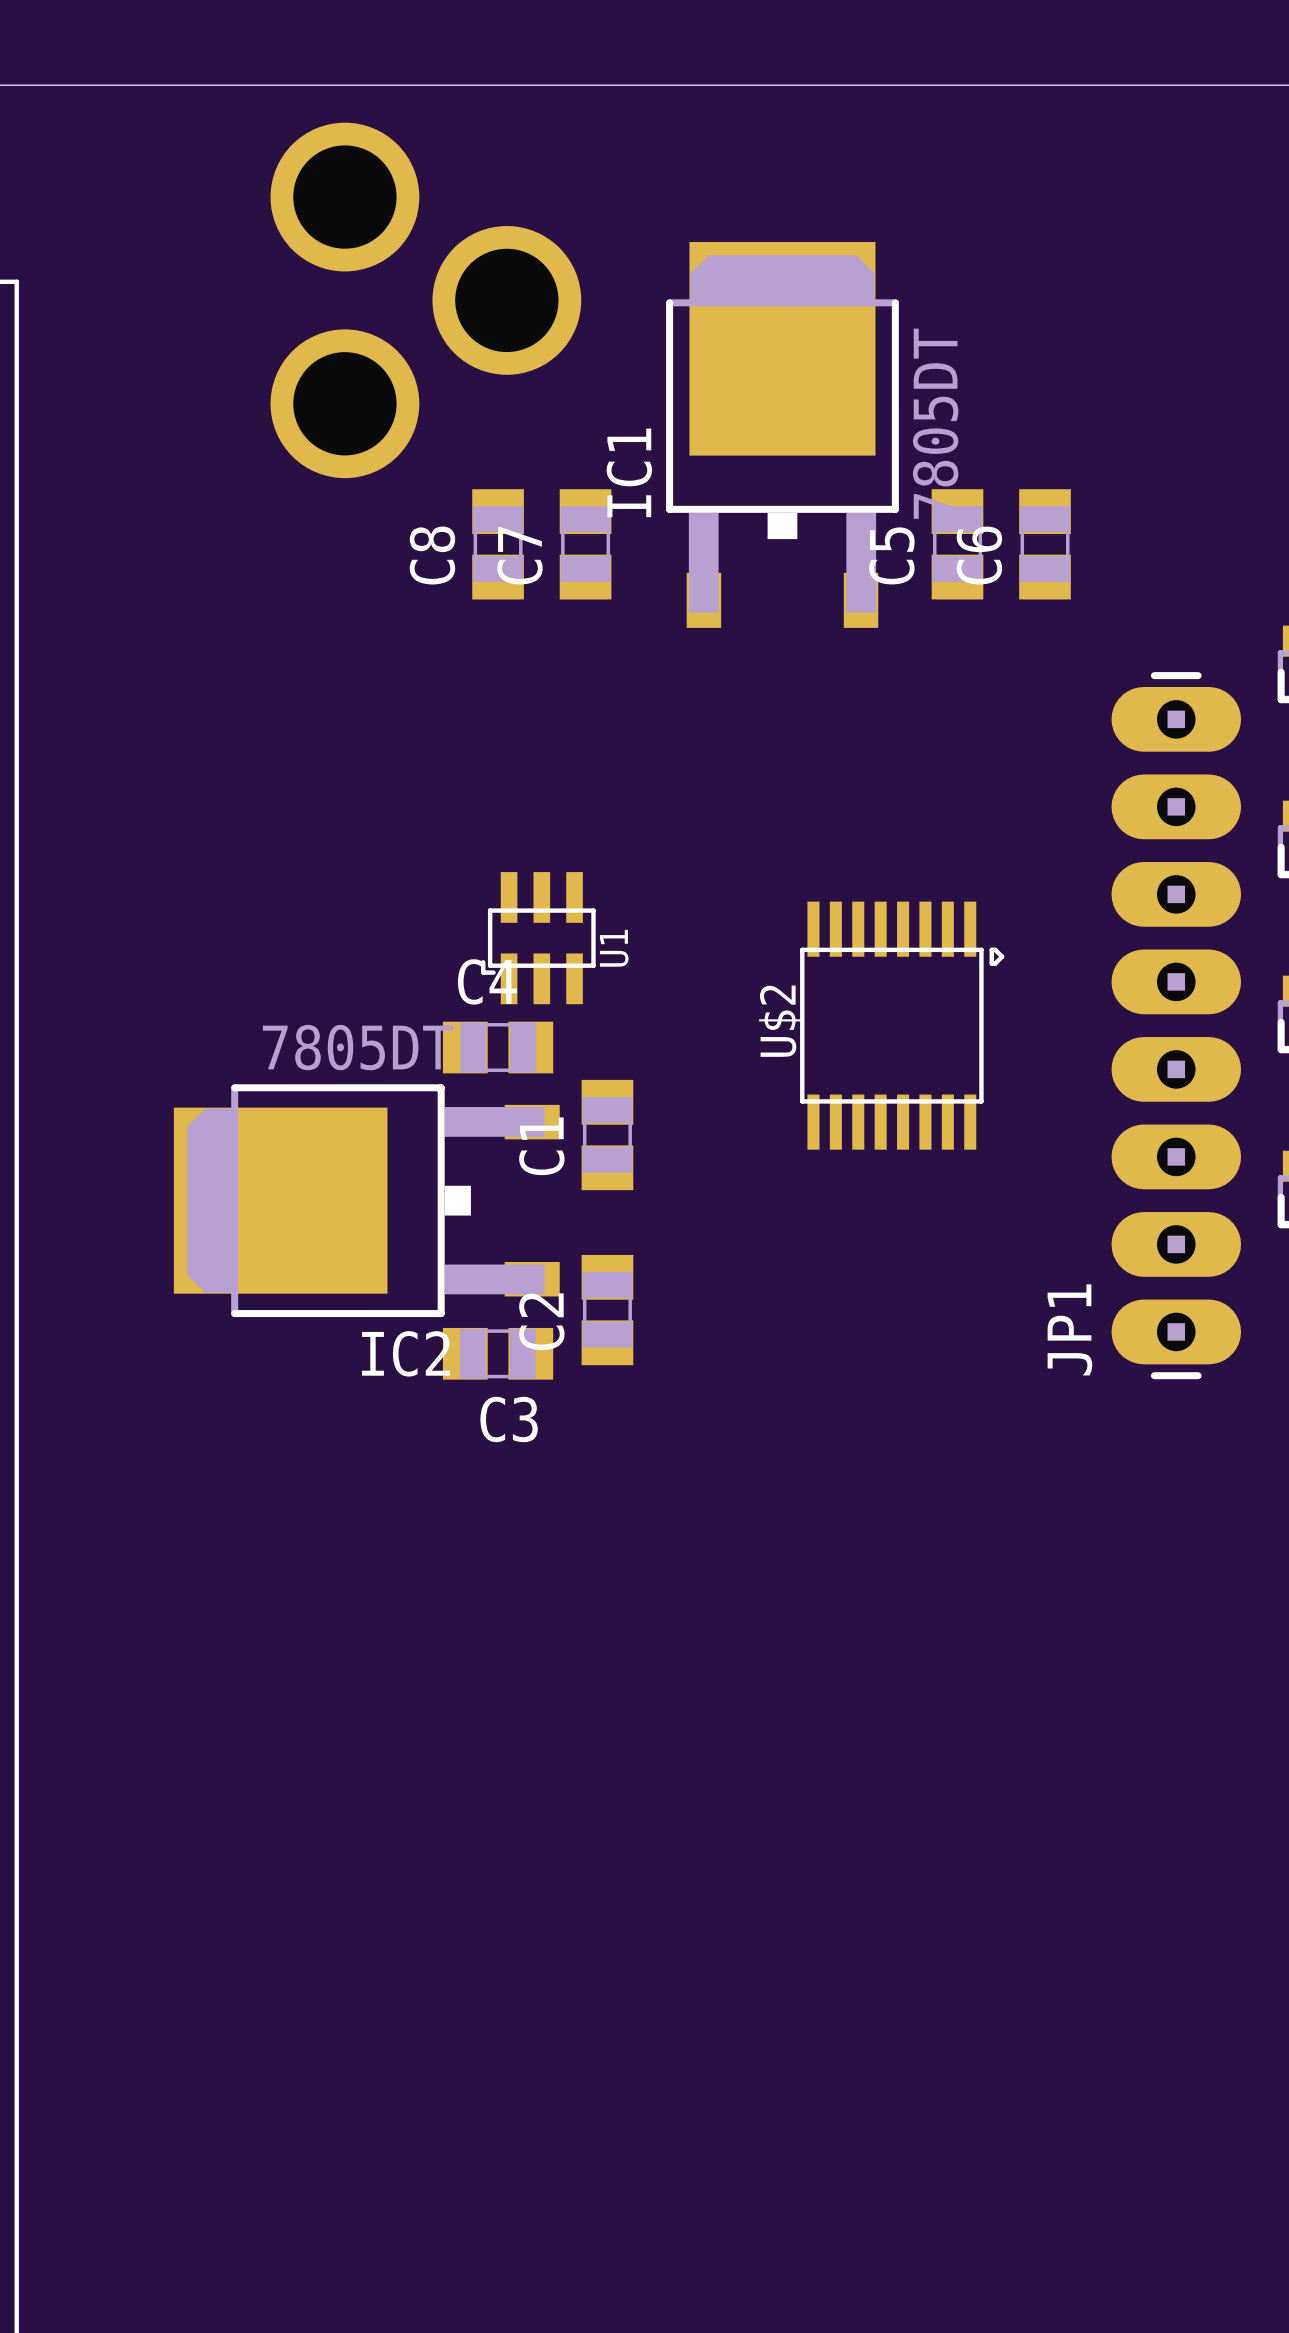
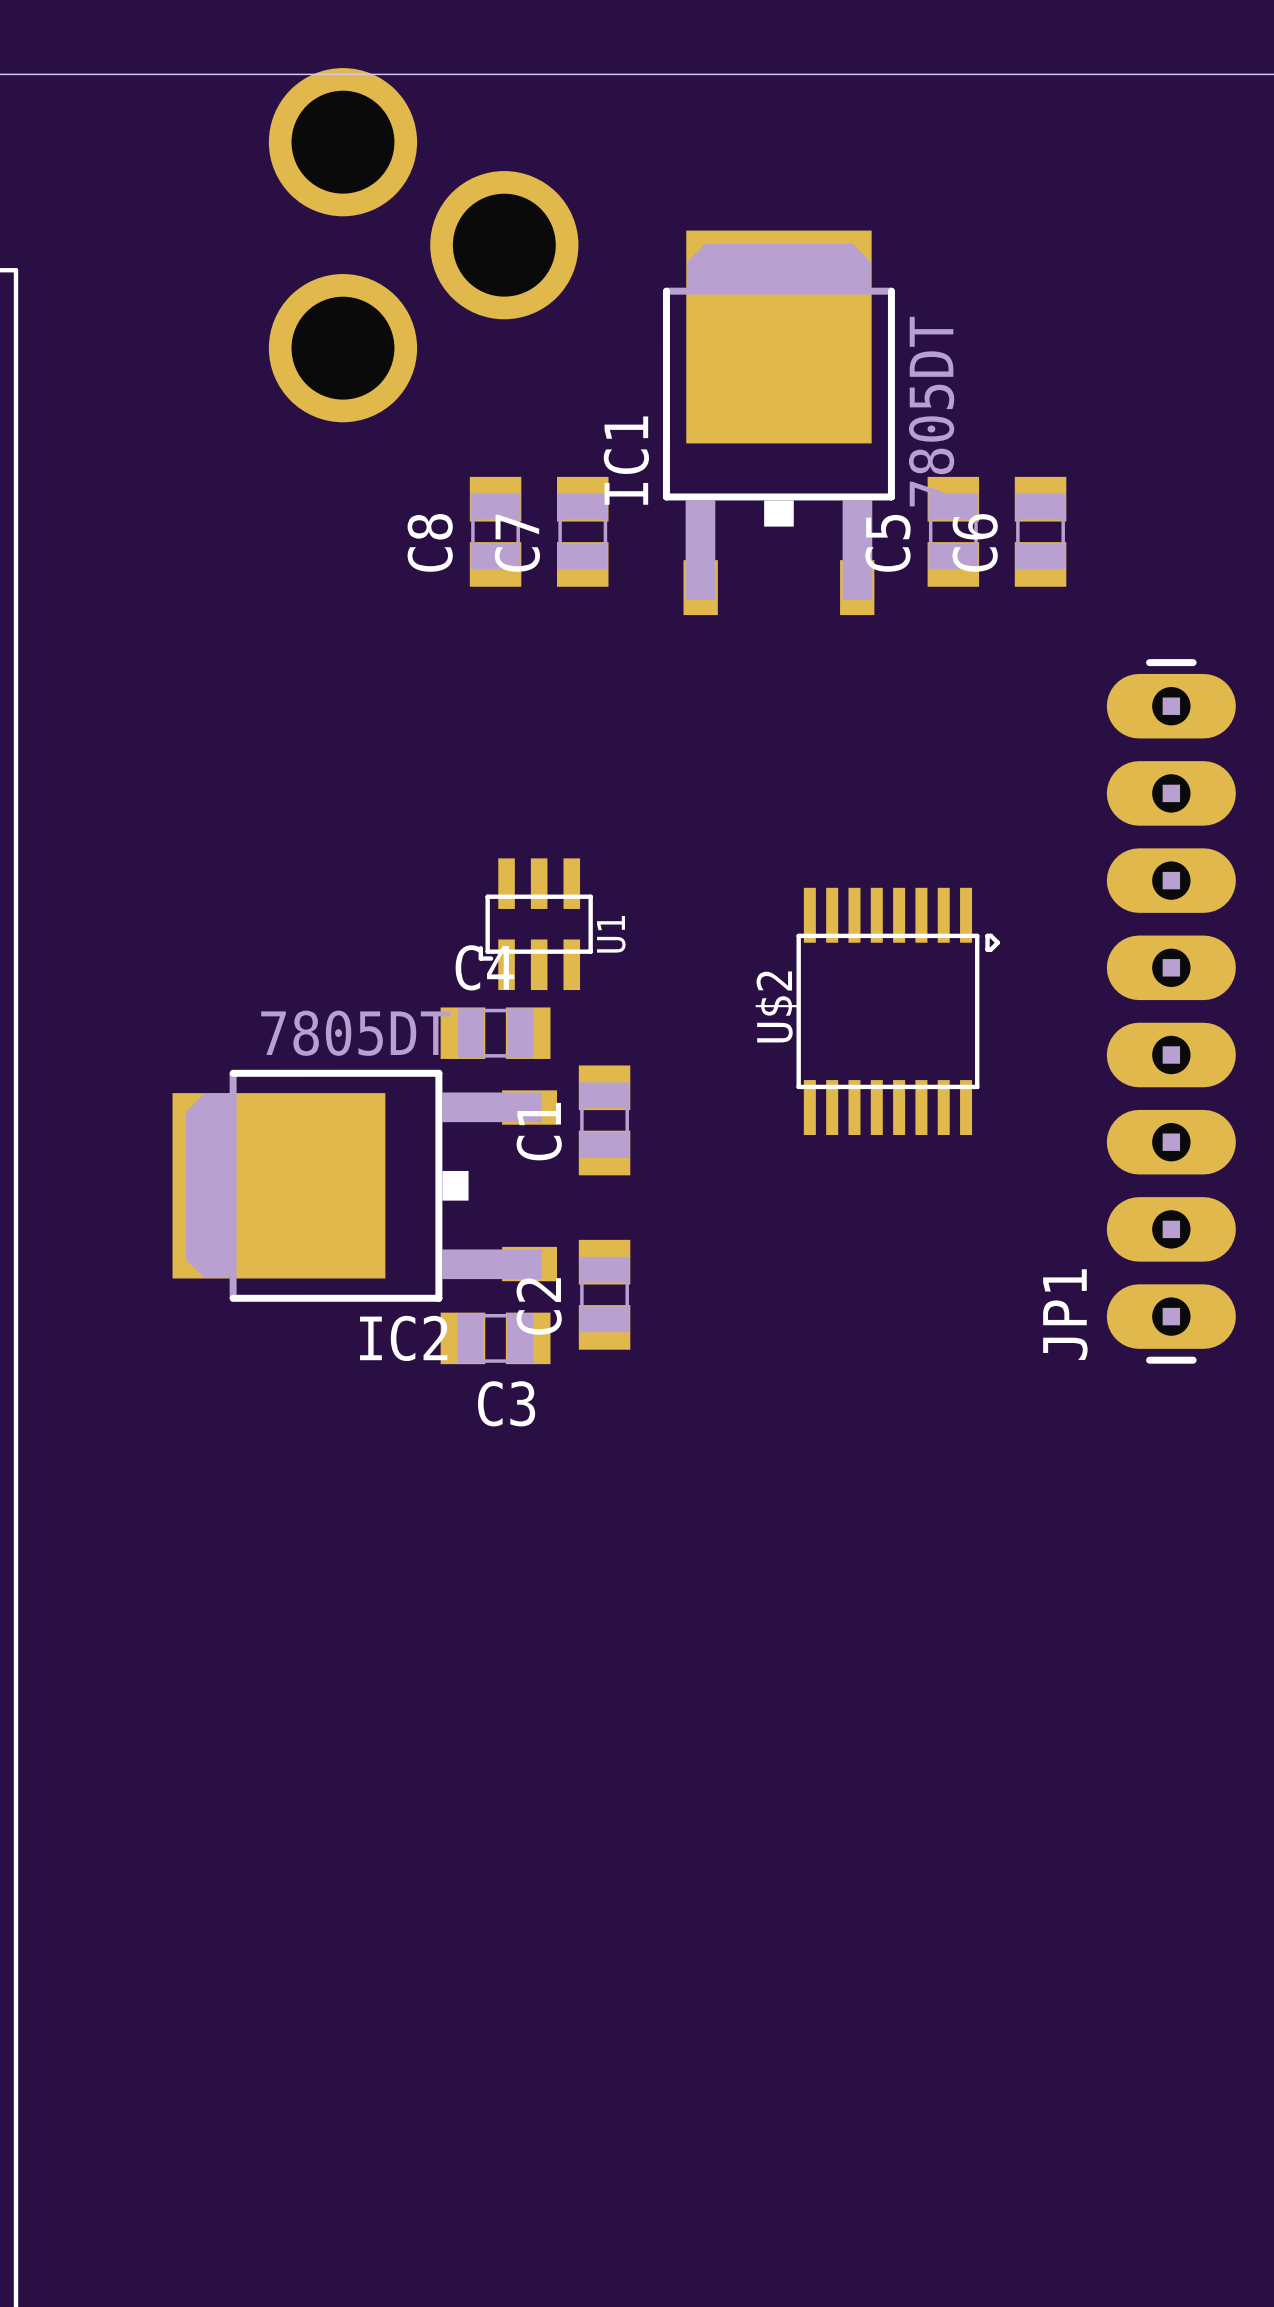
part position: (425, 300) -> (423, 245)

